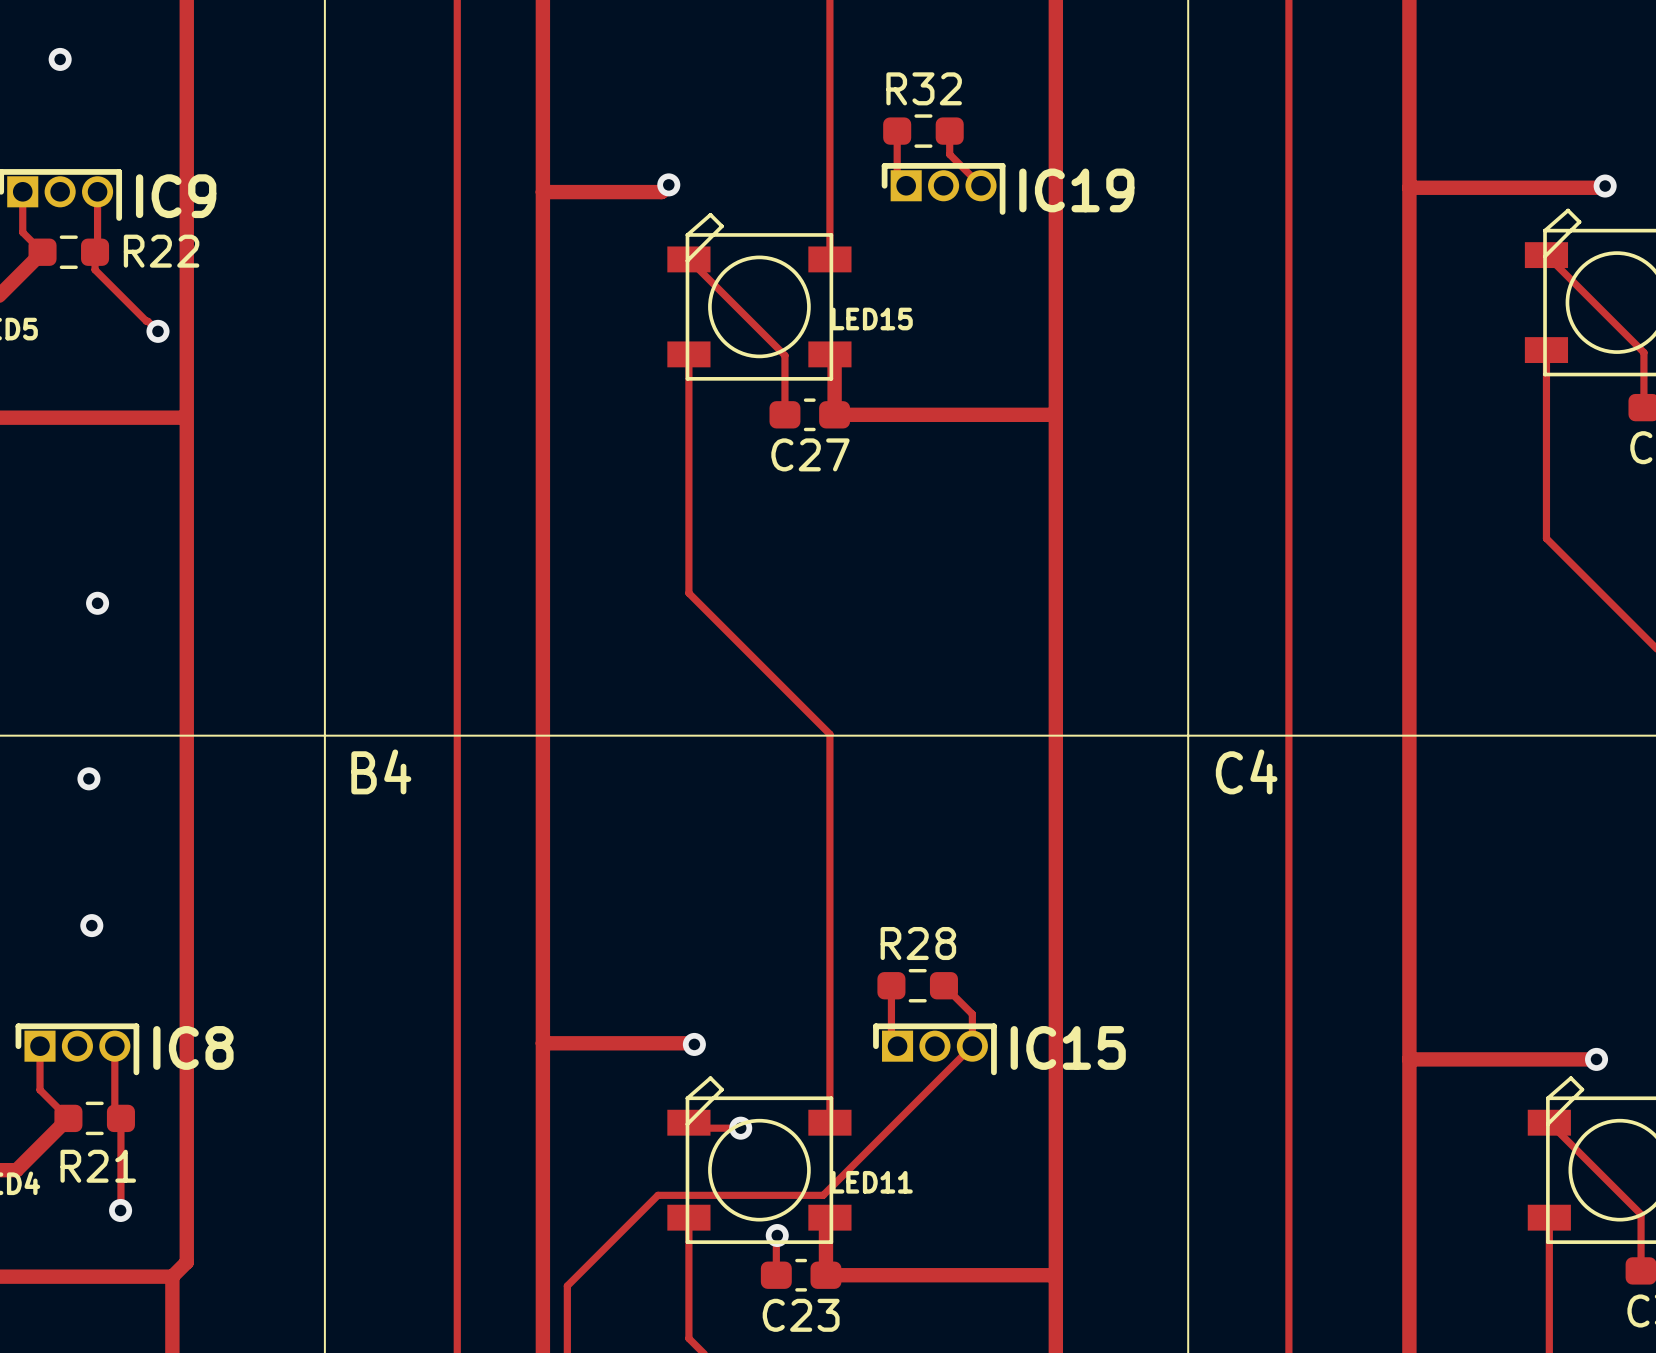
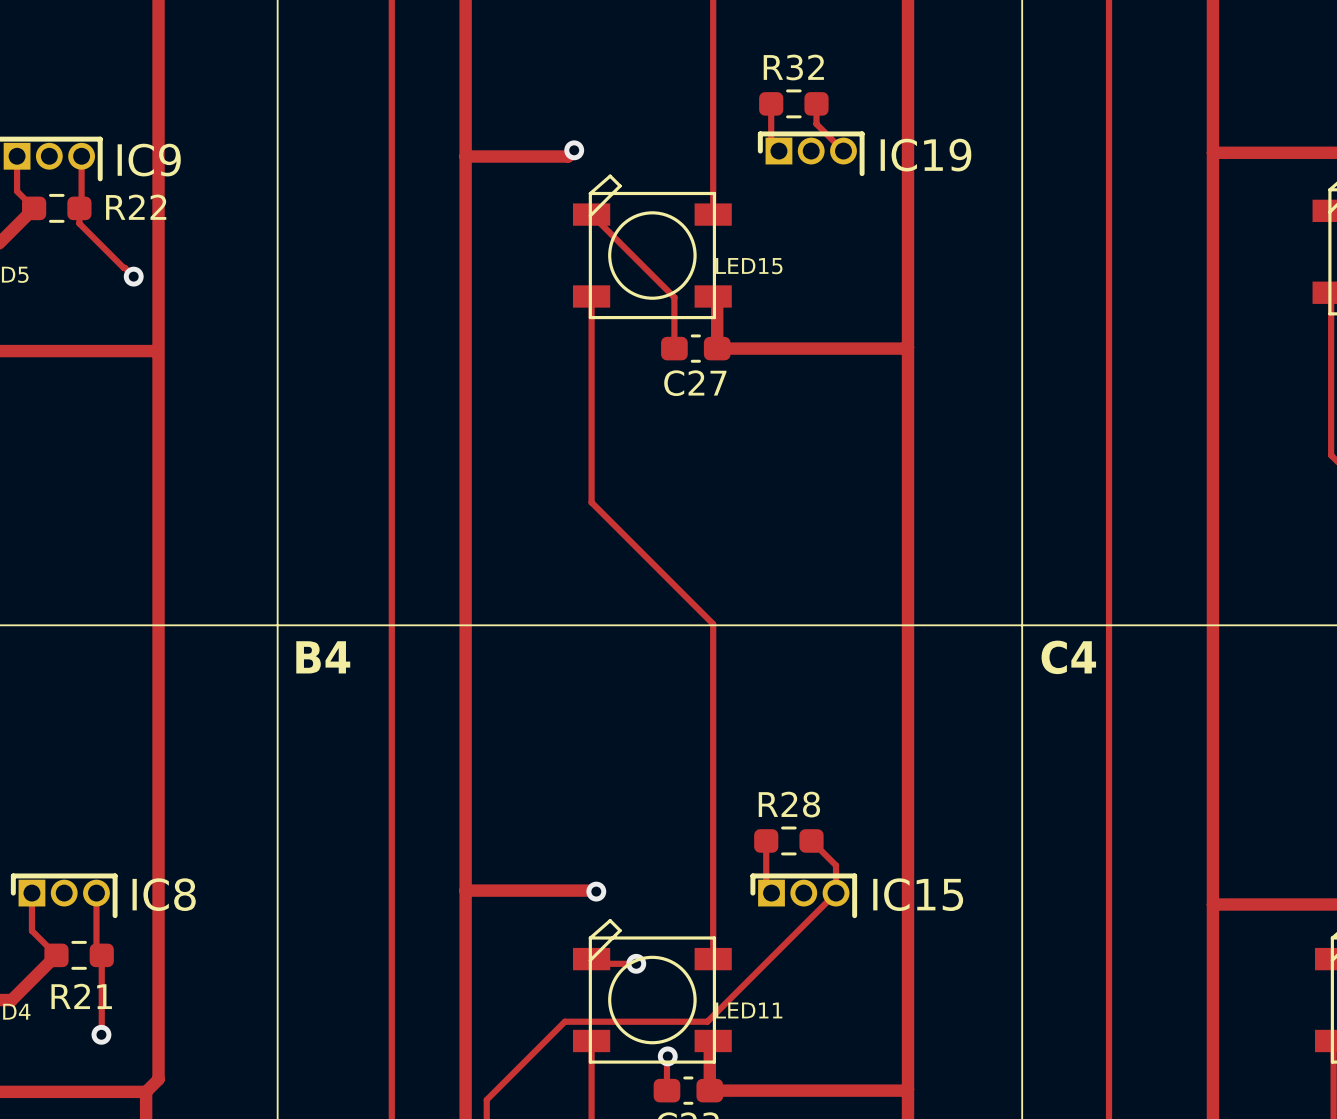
via: (60, 59) -> none
via: (97, 603) -> none
via: (88, 778) -> none
via: (91, 925) -> none

